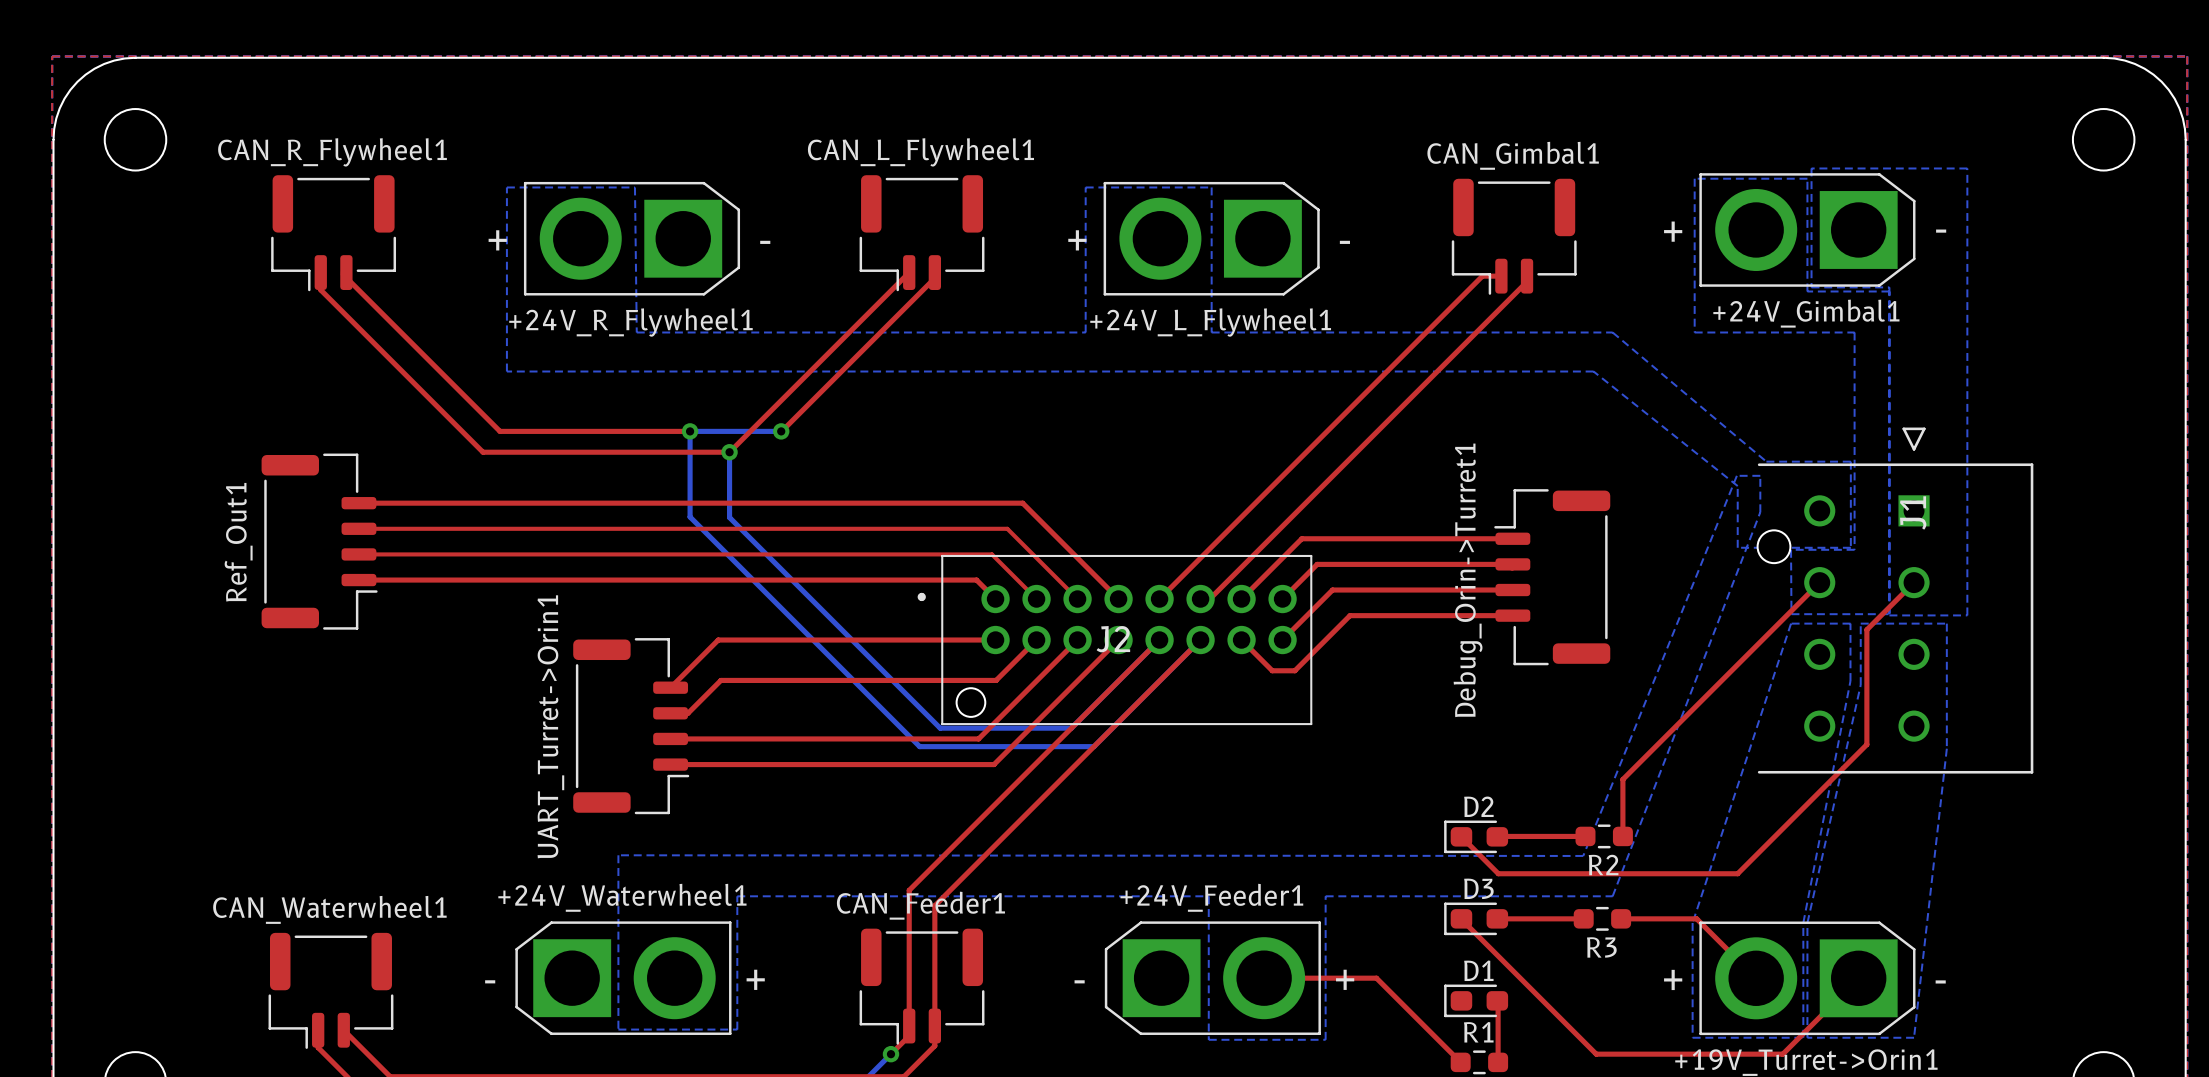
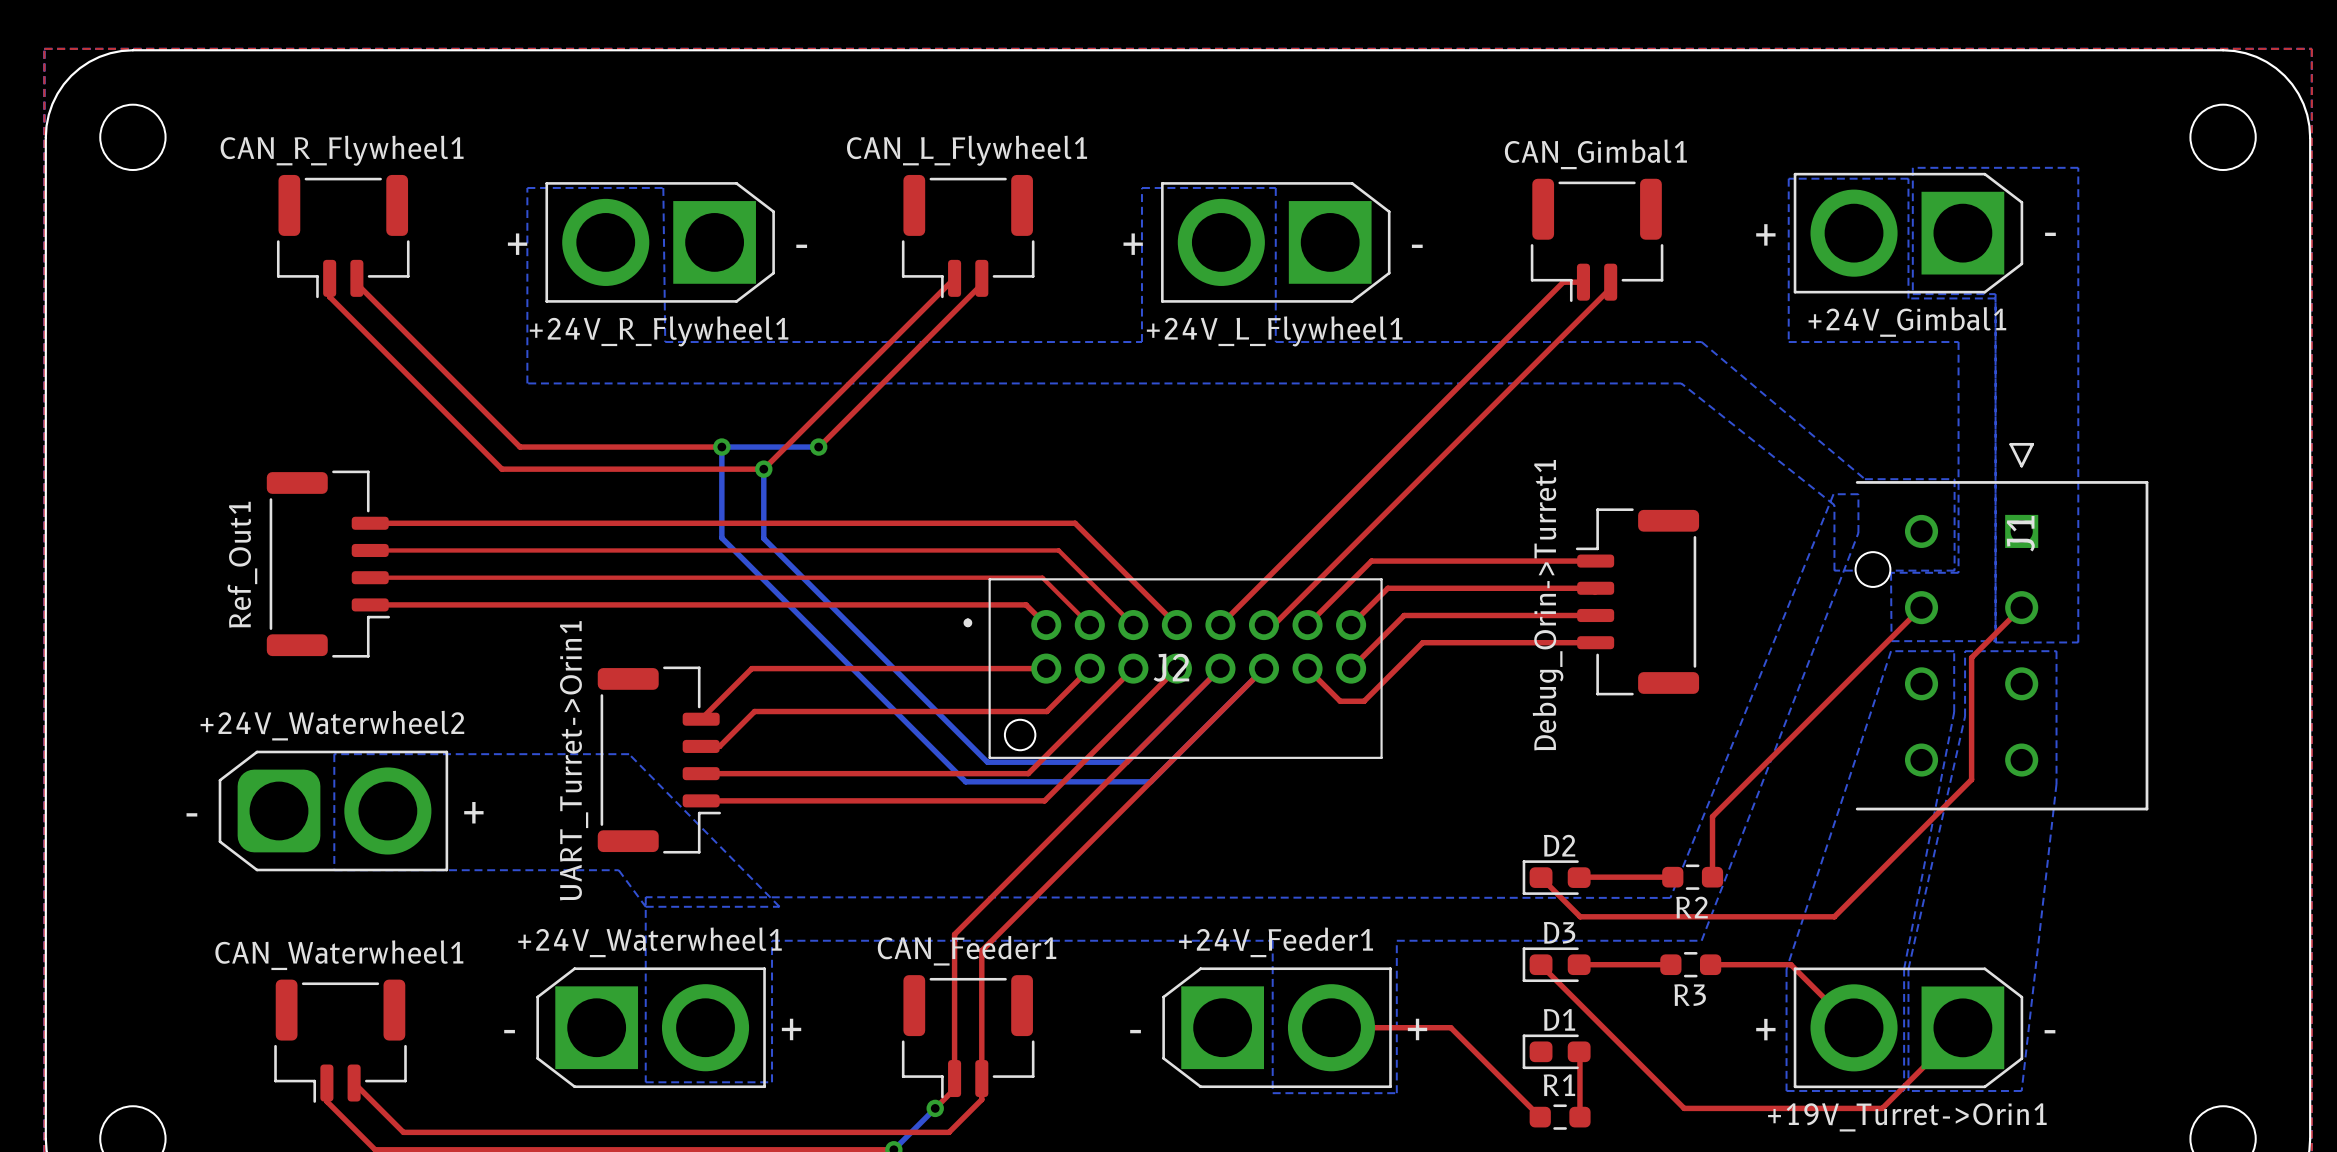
+24V_Waterwheel2: none -> (333, 810)
bottom zone outline: none -> (334, 869) (334, 754) (629, 754) (779, 906) (645, 906) (618, 870) (334, 870)

